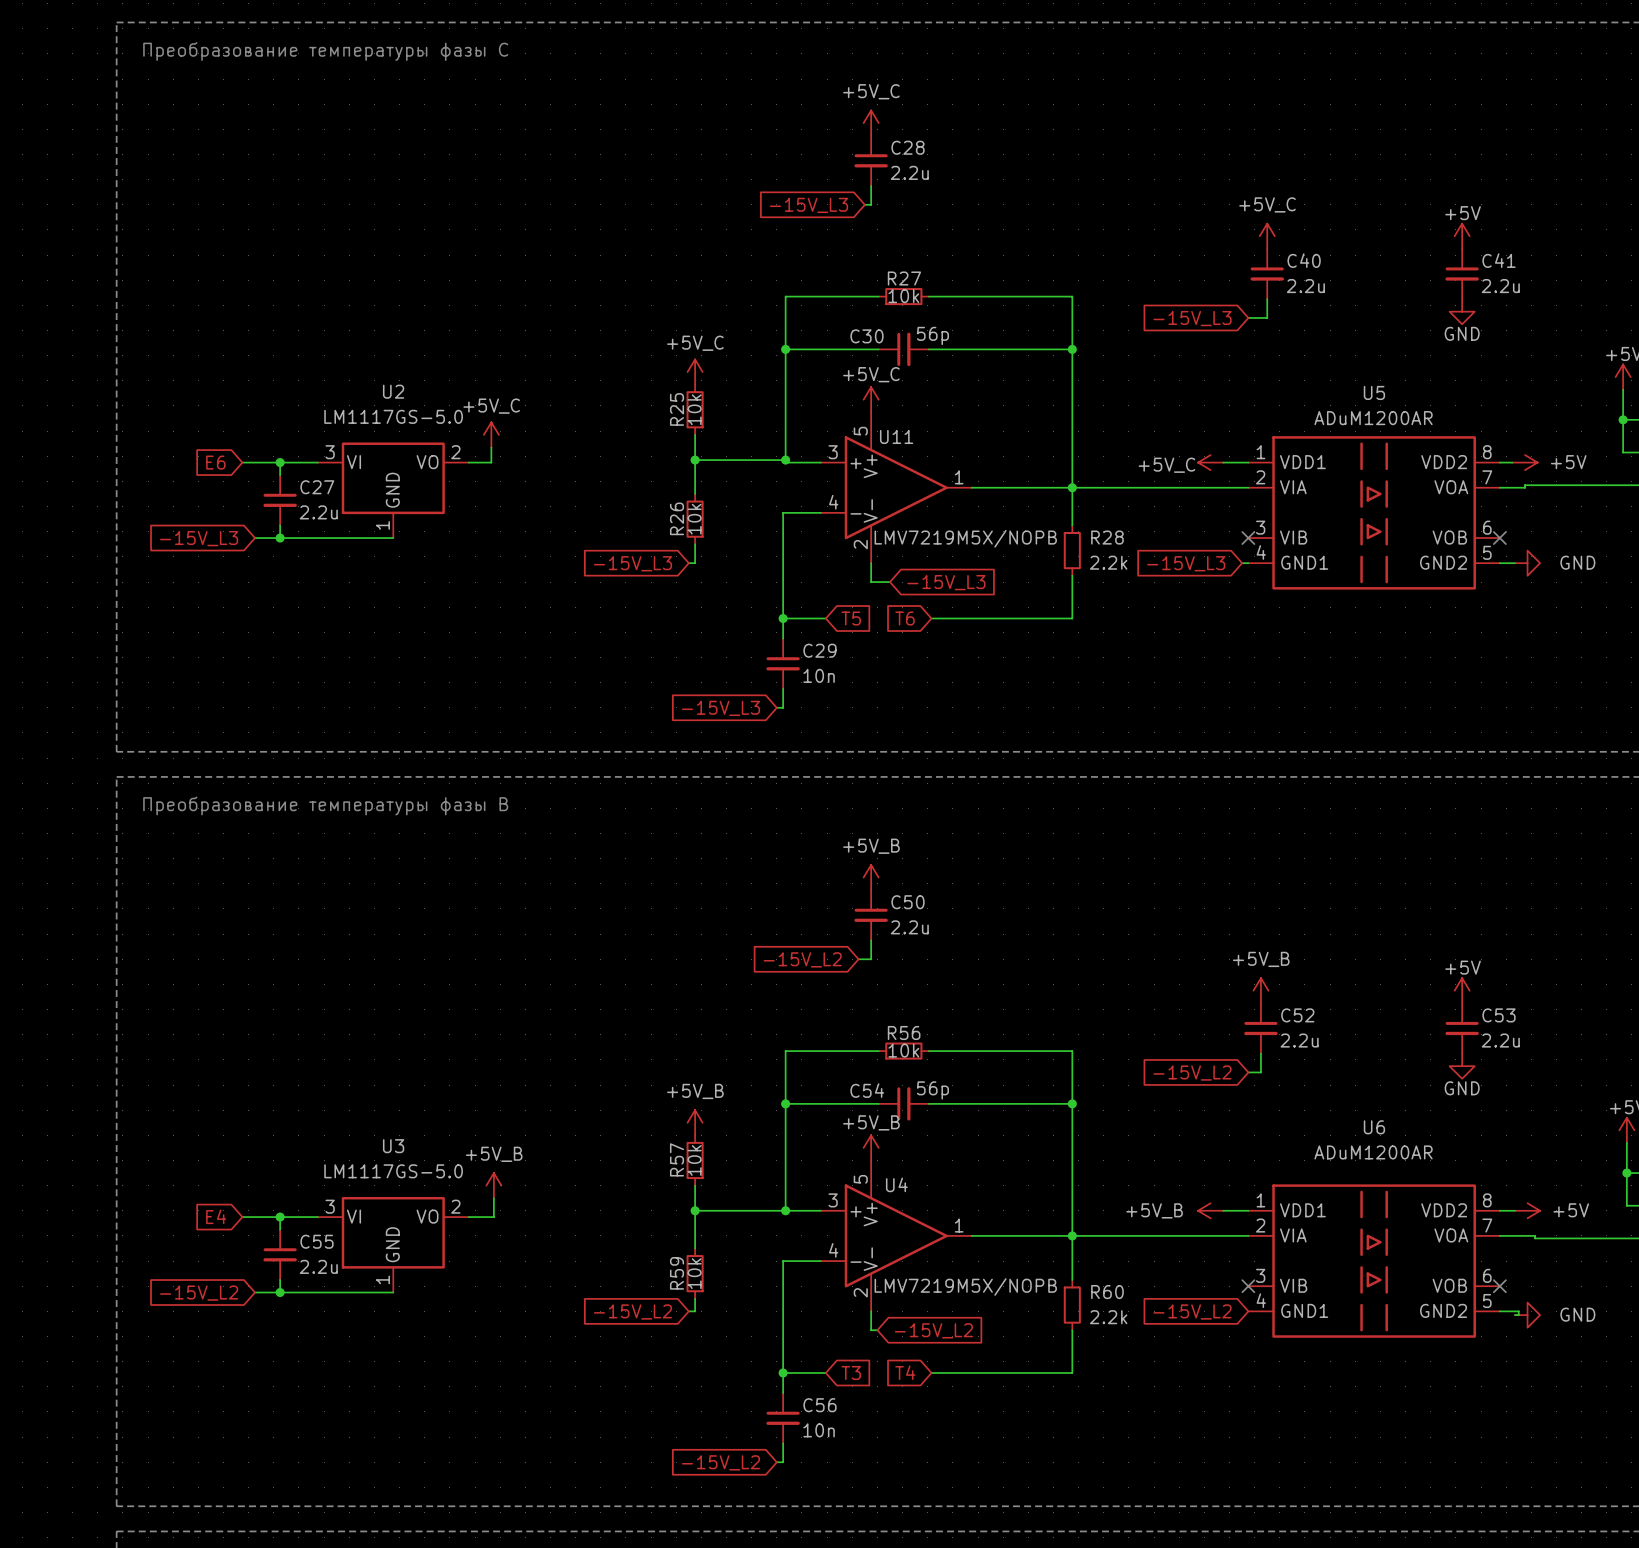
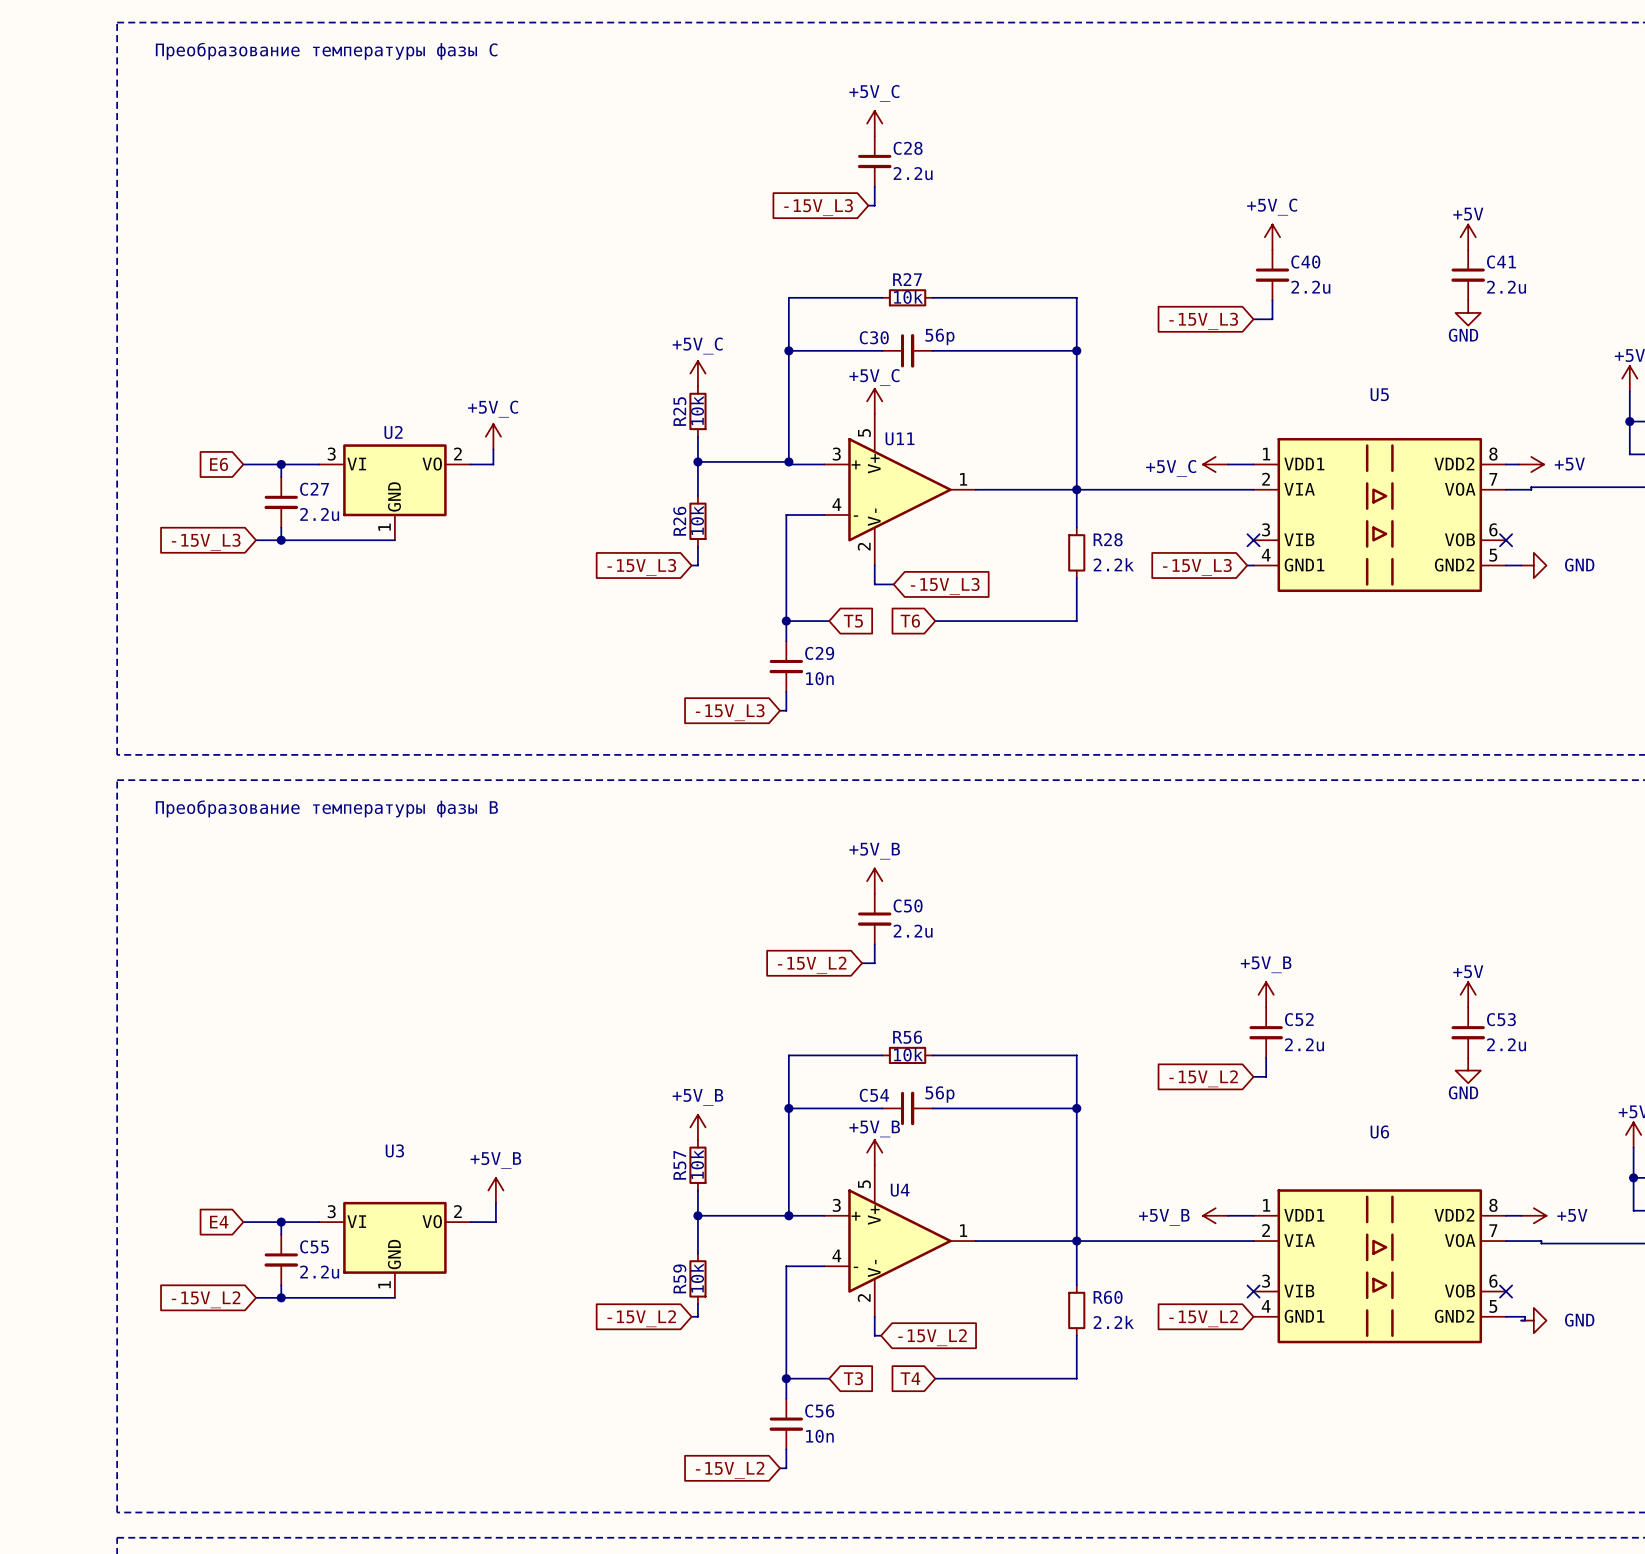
U2 name position: U2 (393, 391) -> U2 (393, 432)
U2 value: LM1117GS-5.0 (393, 416) -> none
U5 value: ADuM1200AR (1373, 418) -> none
U11 value: LMV7219M5X/NOPB (965, 538) -> none
U6 value: ADuM1200AR (1373, 1152) -> none
U3 value: LM1117GS-5.0 (393, 1171) -> none
U4 value: LMV7219M5X/NOPB (965, 1286) -> none

